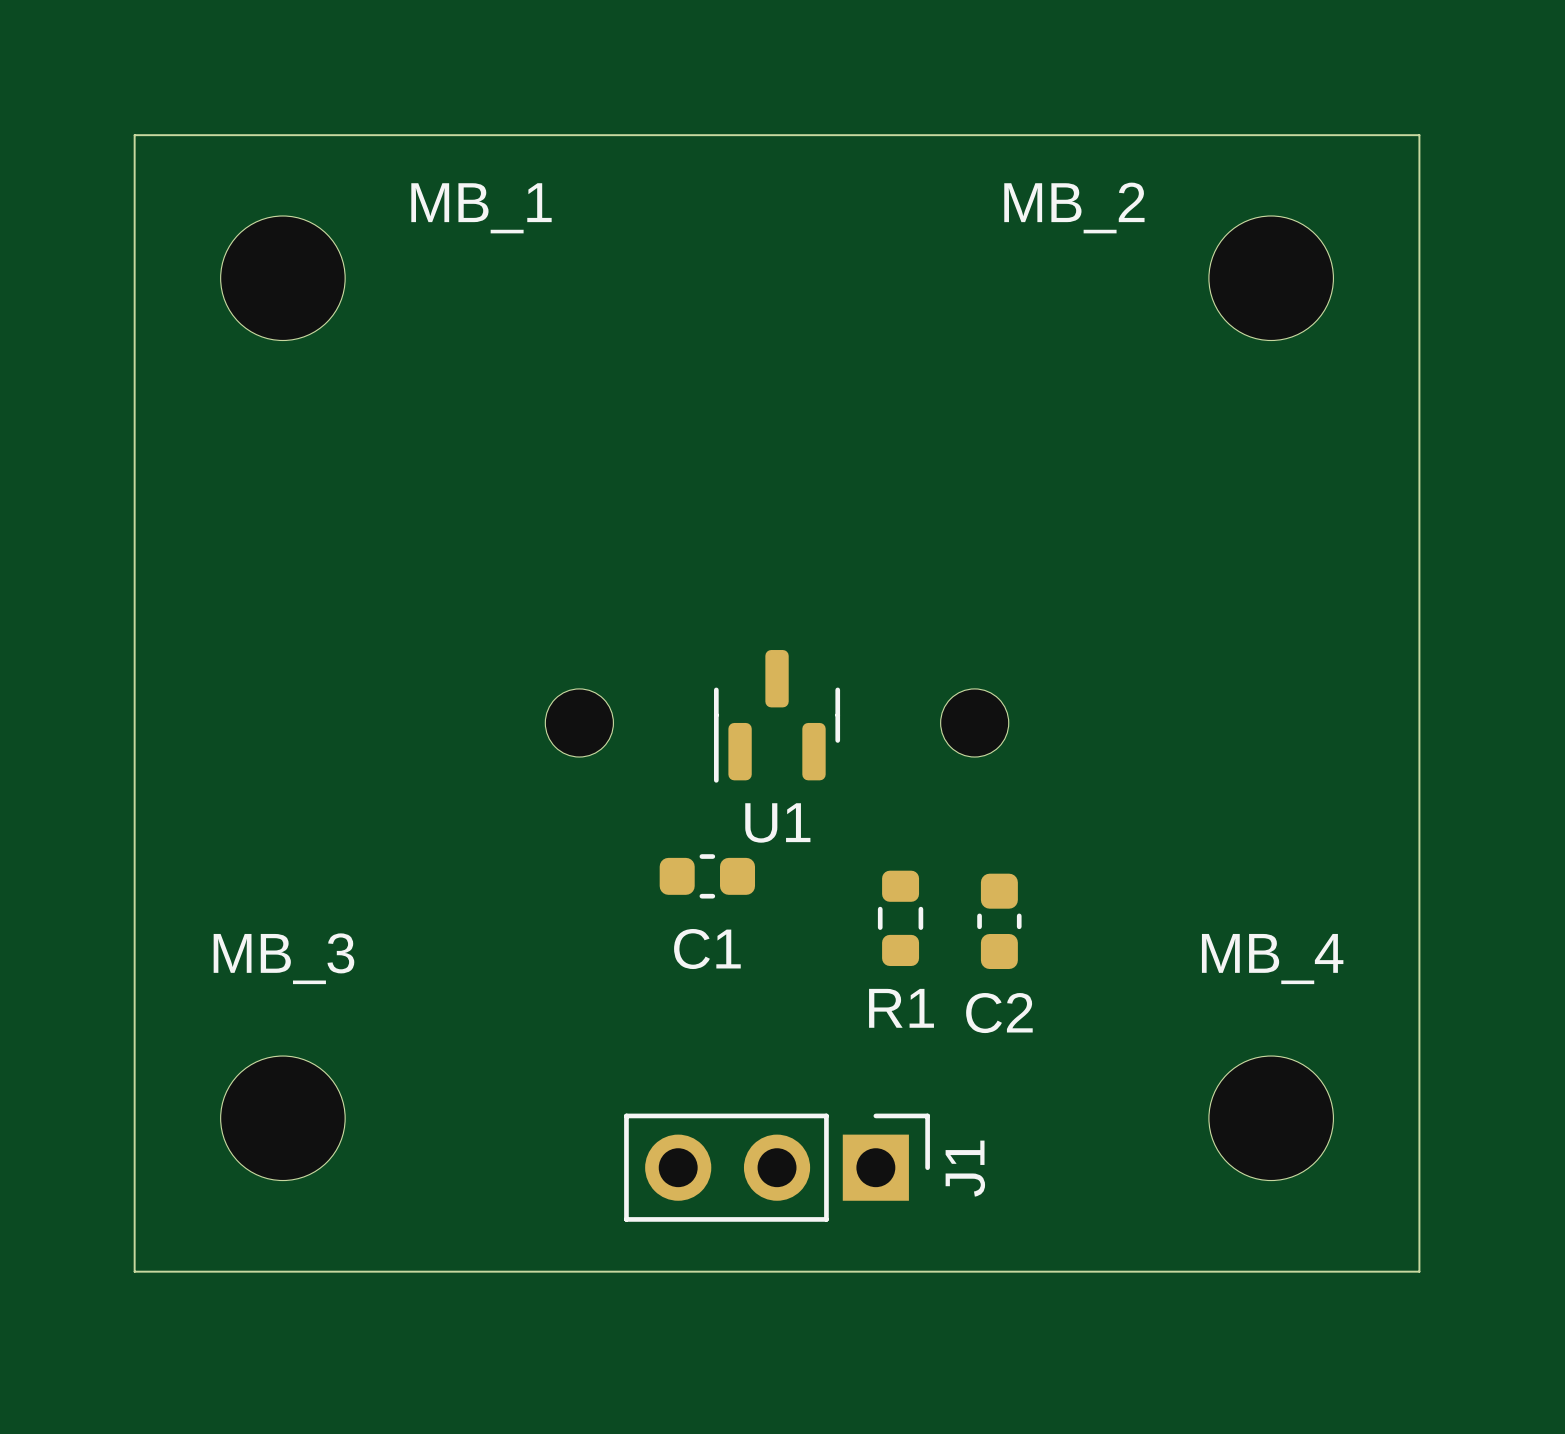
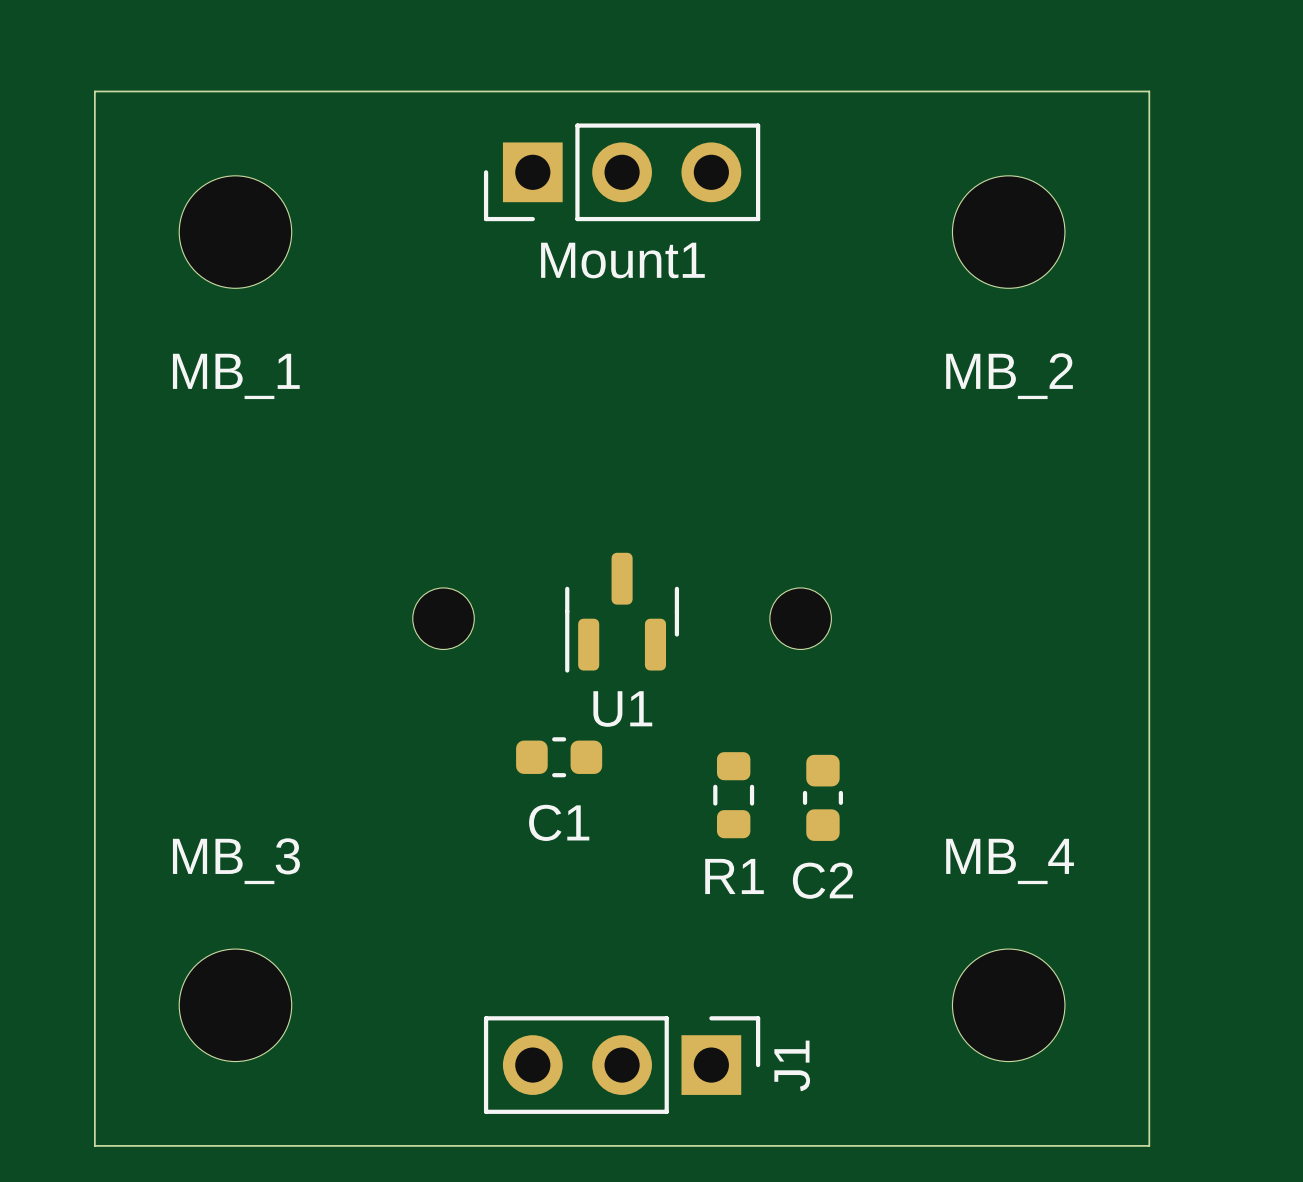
board edge: (134, 135) (1419, 135) (1419, 1271) (134, 1271) (134, 135) -> (94, 91) (94, 1145) (1149, 1145) (1149, 91) (94, 91)
MB_2 name position: MB_2 (1074, 207) -> MB_2 (1009, 376)
MB_1 name position: MB_1 (481, 208) -> MB_1 (236, 376)
Mount1: none -> (622, 172)
MB_1 position: (282, 278) -> (235, 232)
MB_2 position: (1271, 278) -> (1008, 232)
MB_3 position: (282, 1118) -> (235, 1005)
MB_4 position: (1271, 1118) -> (1008, 1005)
J1 position: (777, 1167) -> (622, 1065)

